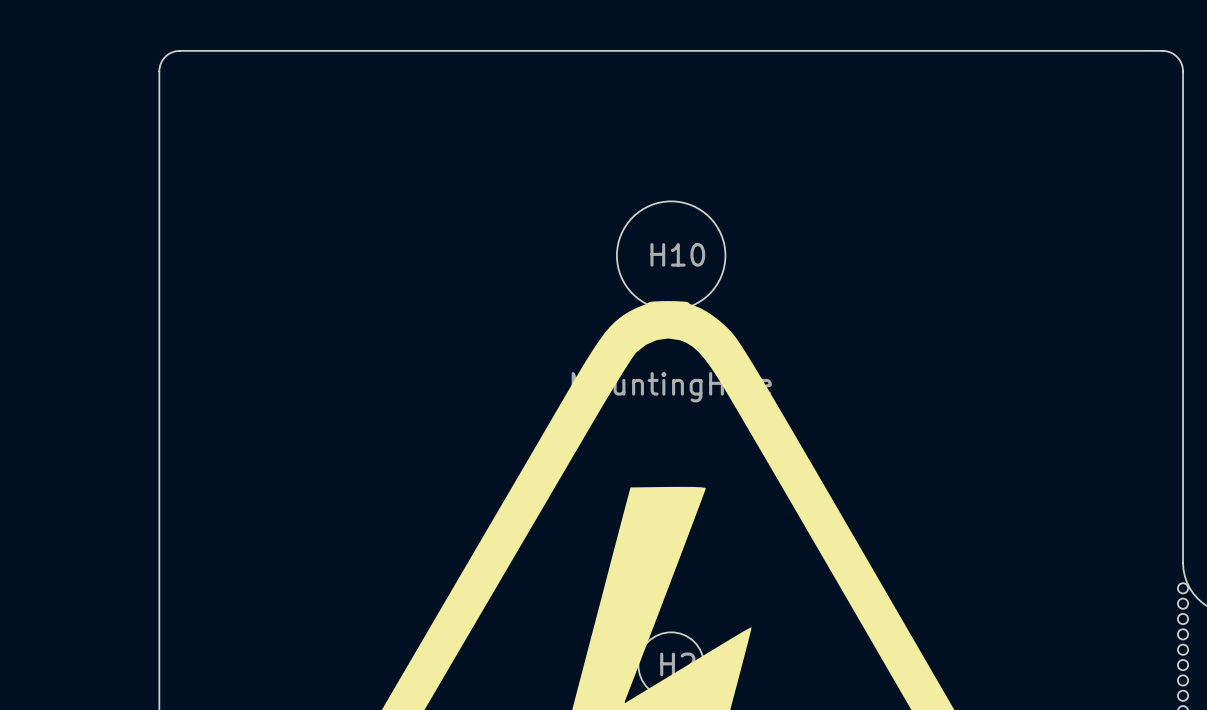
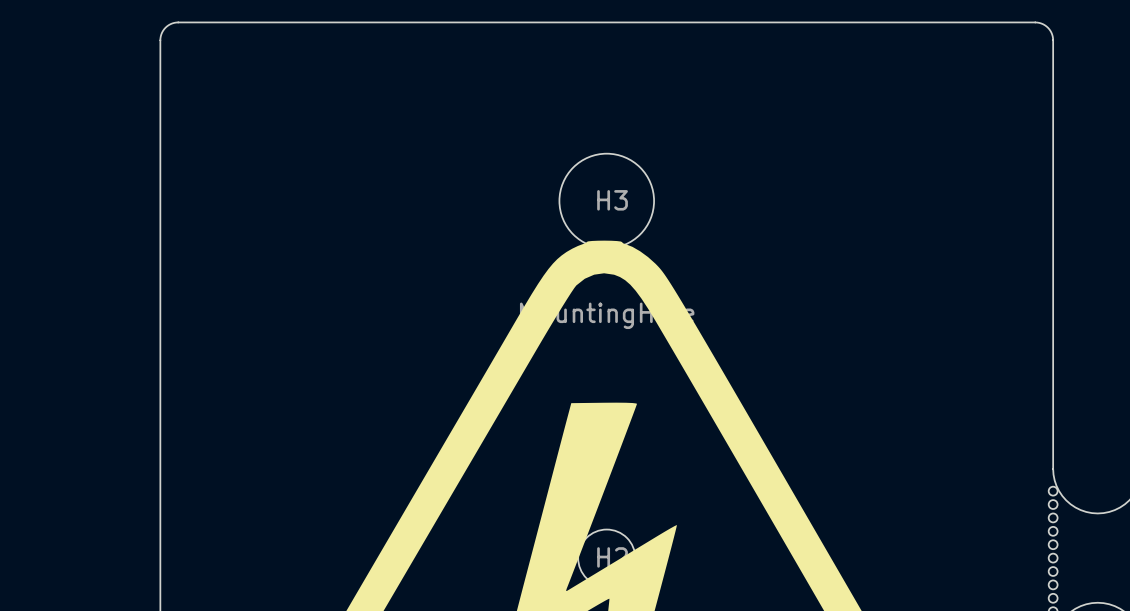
H10 name: H10 (677, 254) -> H3 (612, 200)

